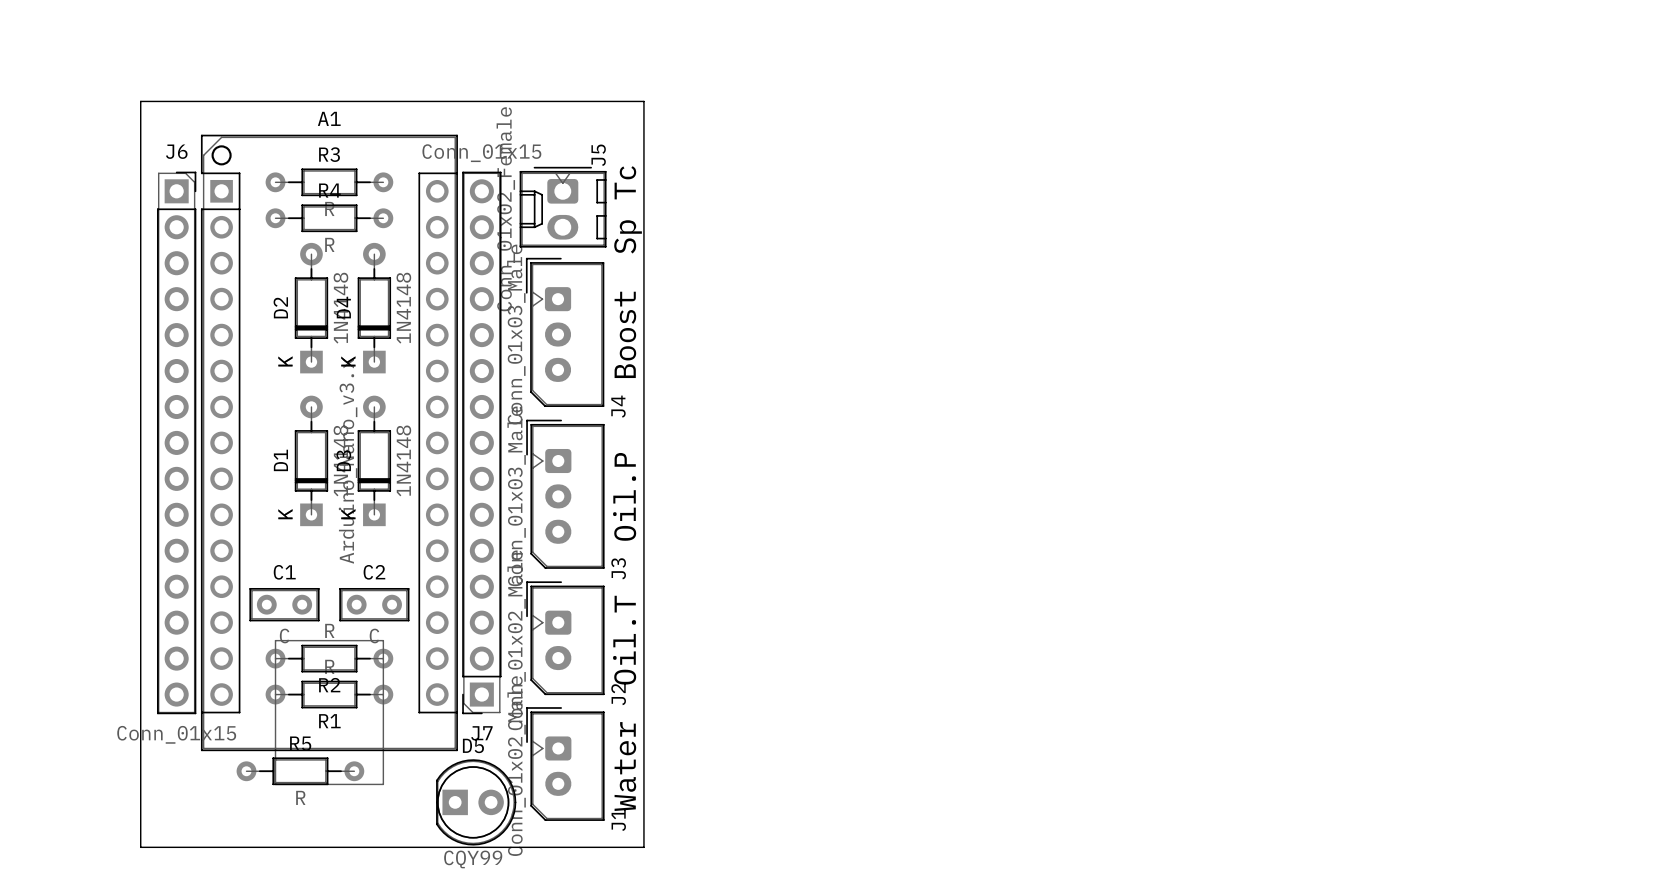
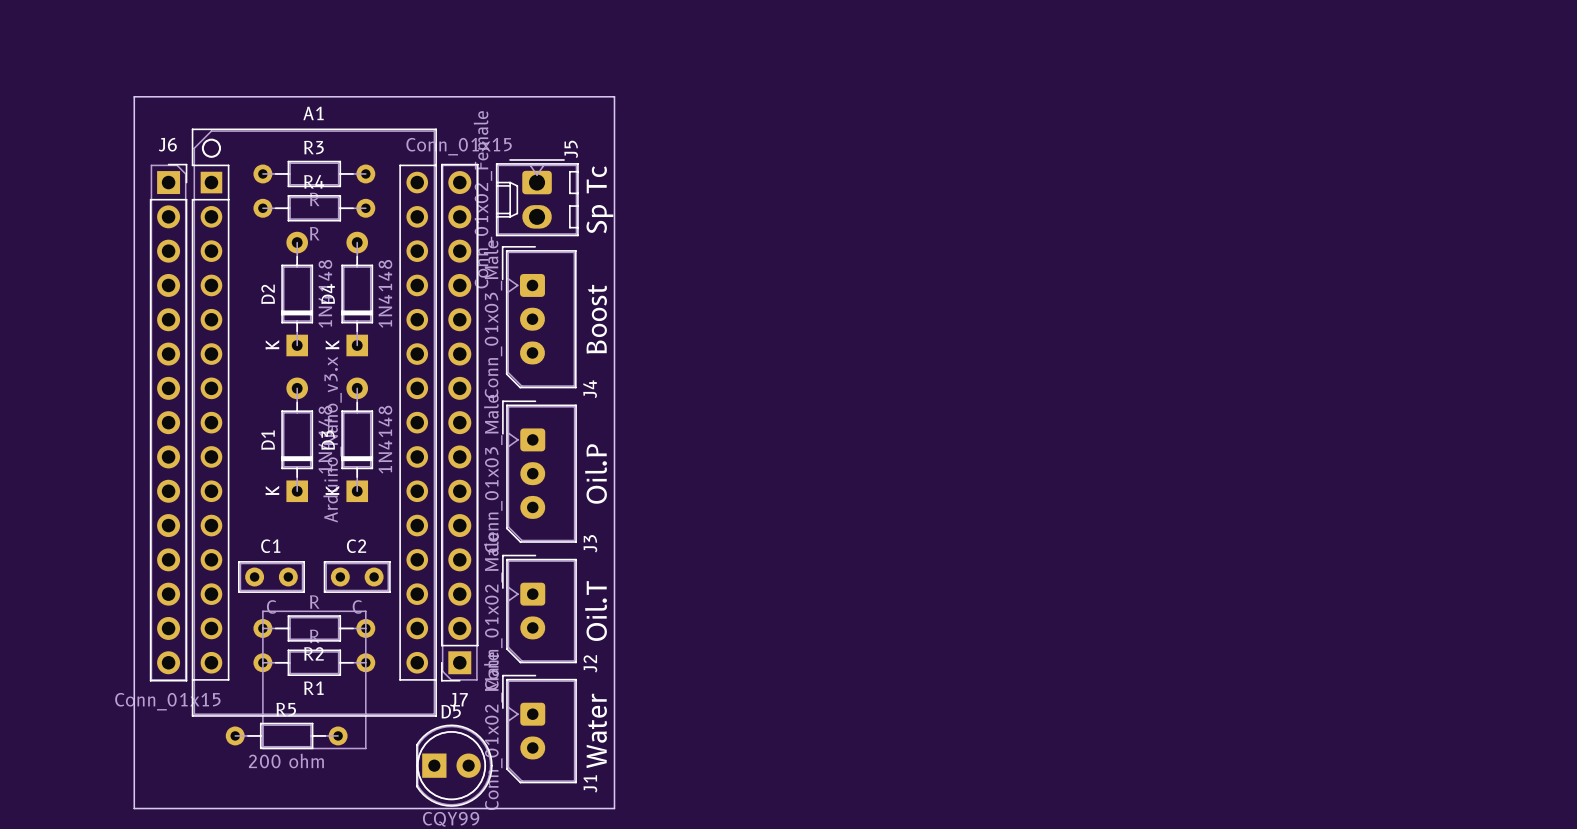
R5 value: R (300, 797) -> 200 ohm (286, 761)

